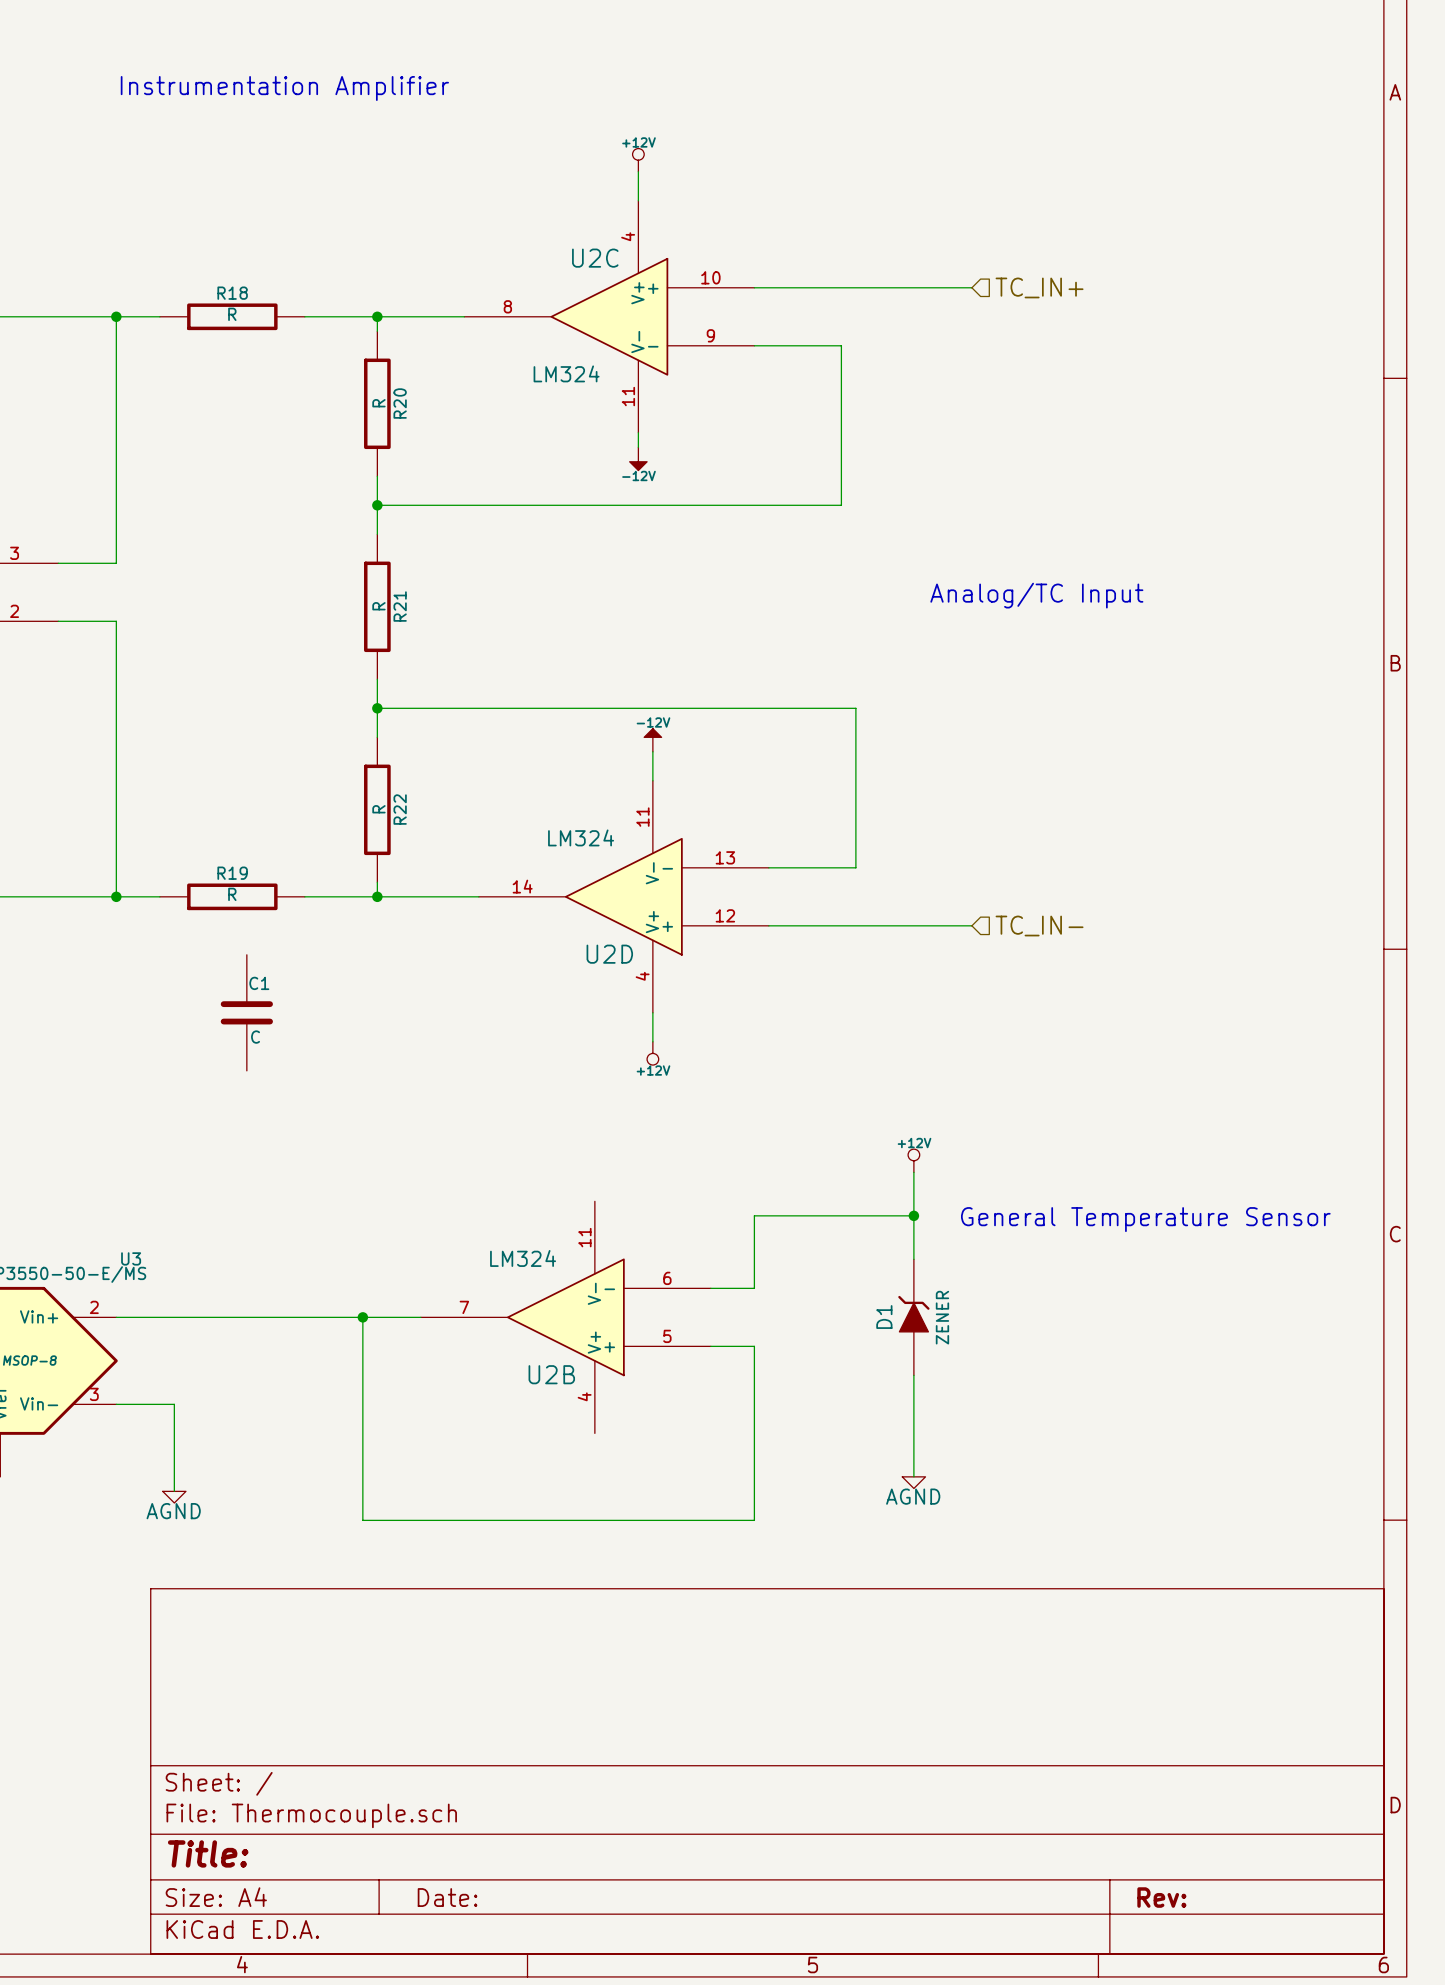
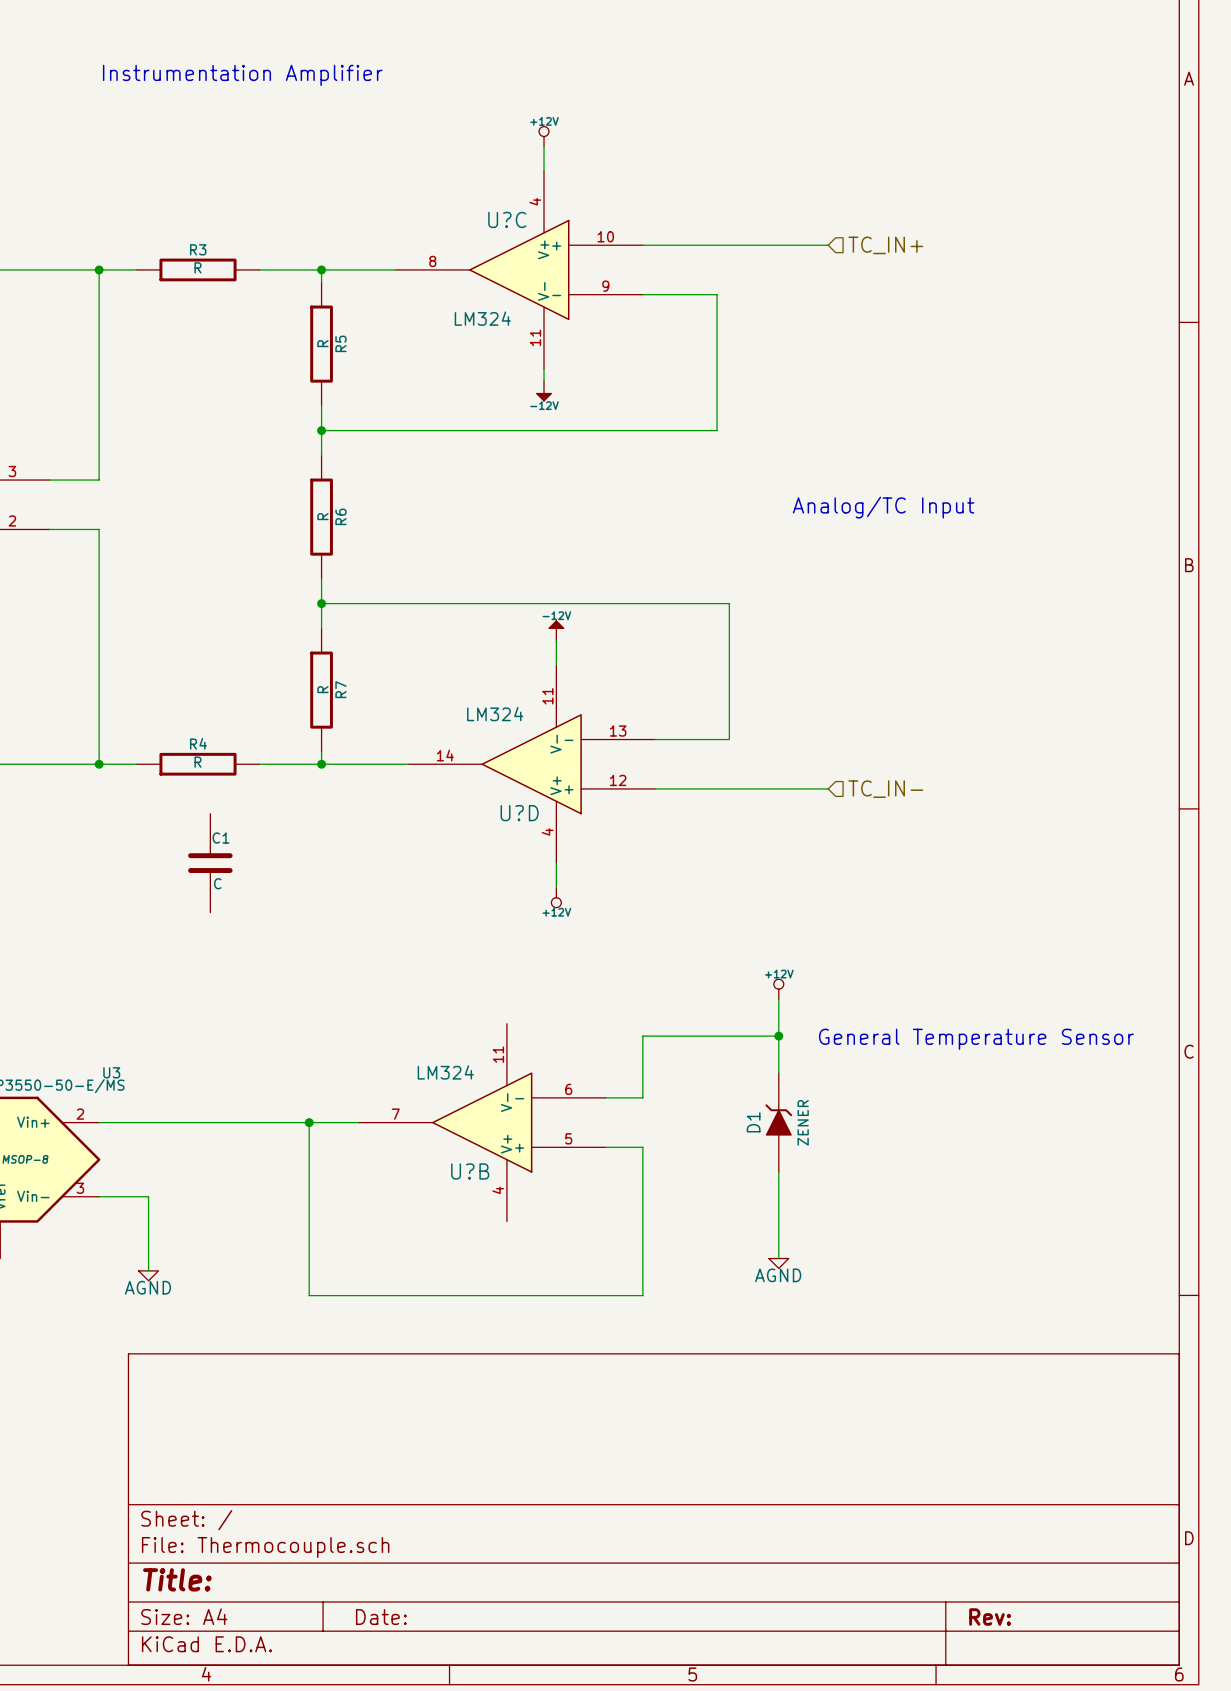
U2C name: U2C (595, 258) -> U?C (507, 219)
R18 name: R18 (232, 293) -> R3 (198, 249)
R20 name: R20 (400, 403) -> R5 (340, 343)
R21 name: R21 (400, 606) -> R6 (340, 516)
R22 name: R22 (400, 809) -> R7 (340, 689)
R19 name: R19 (232, 873) -> R4 (198, 743)
U2D name: U2D (609, 954) -> U?D (519, 813)
U2B name: U2B (551, 1374) -> U?B (470, 1171)

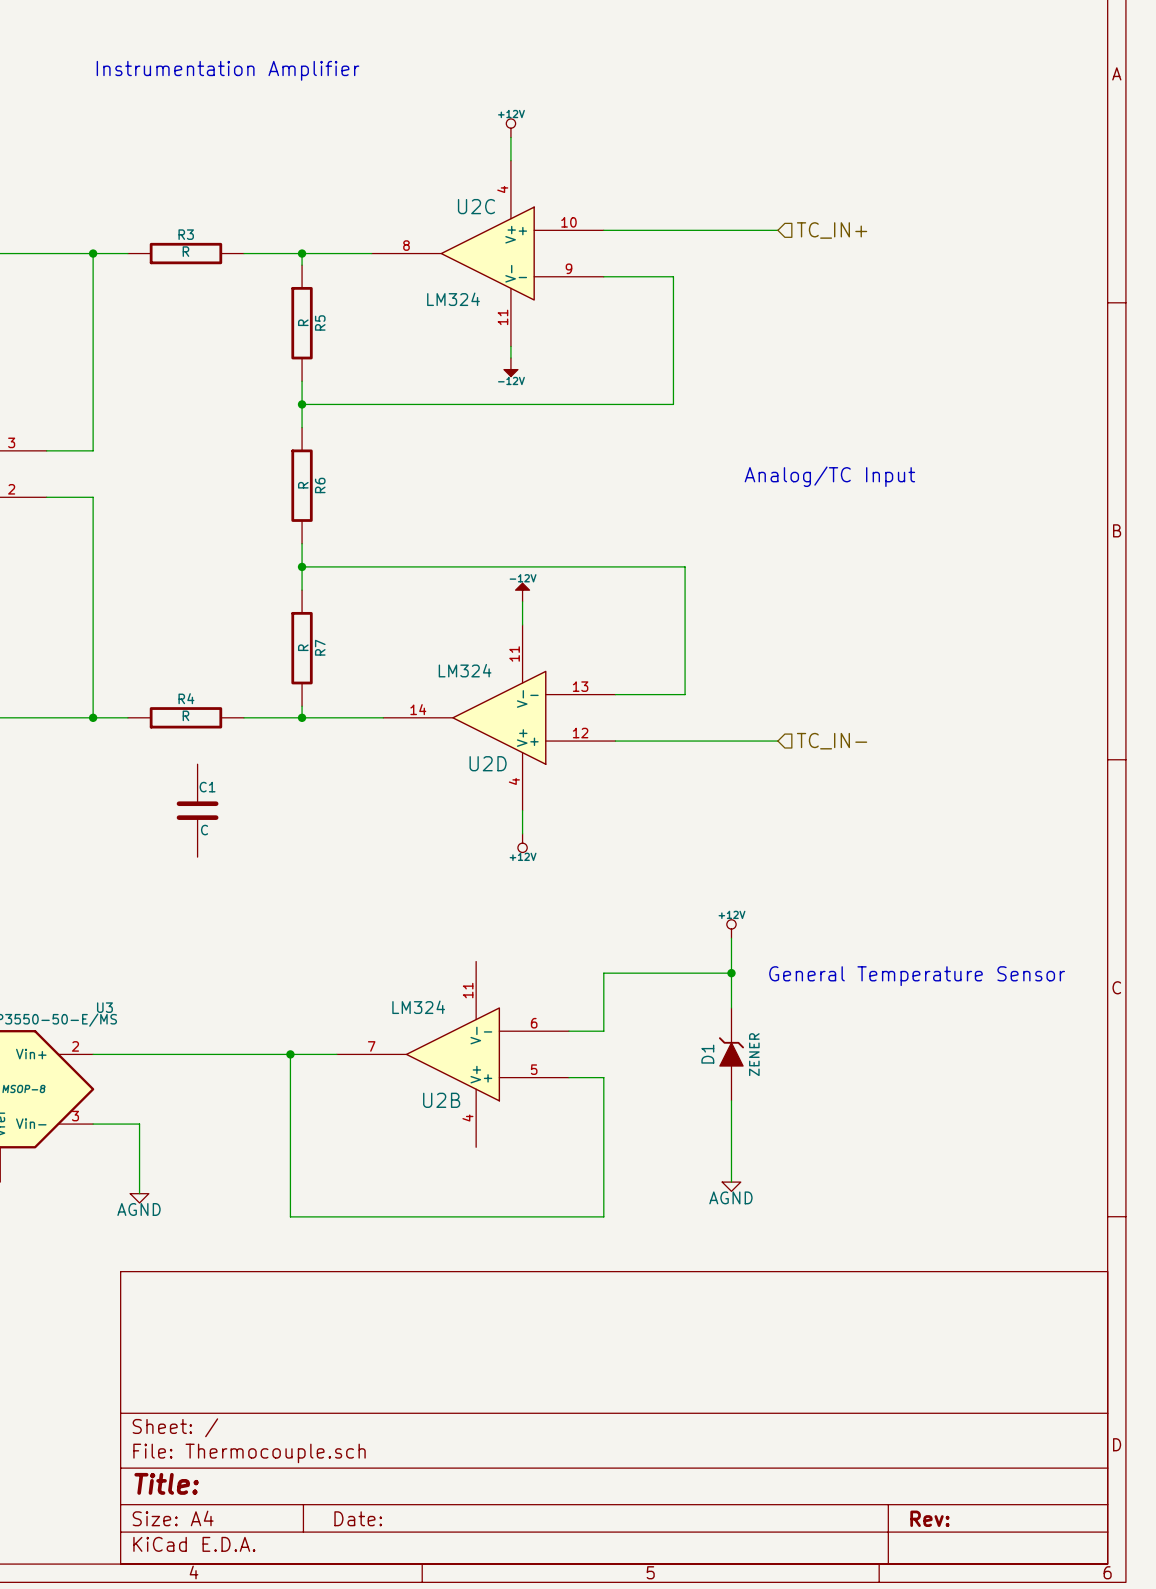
U?C name: U?C (507, 219) -> U2C (476, 206)
U?D name: U?D (519, 813) -> U2D (488, 763)
U?B name: U?B (470, 1171) -> U2B (441, 1100)

